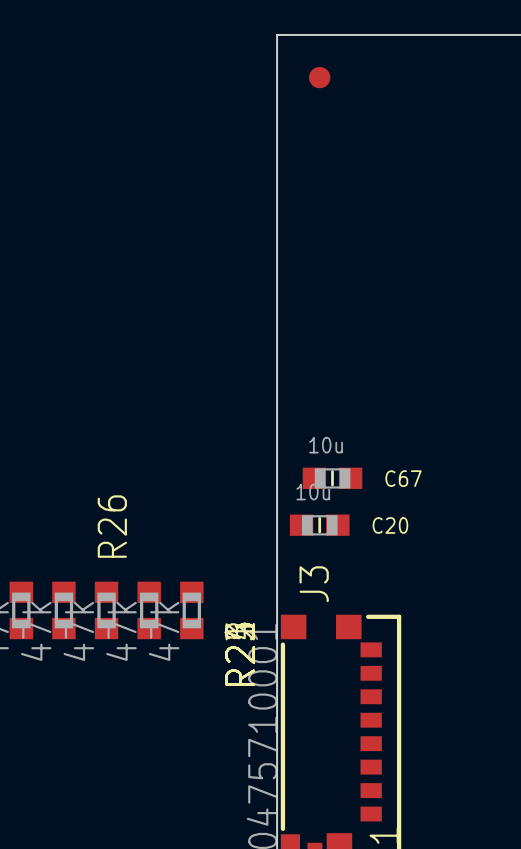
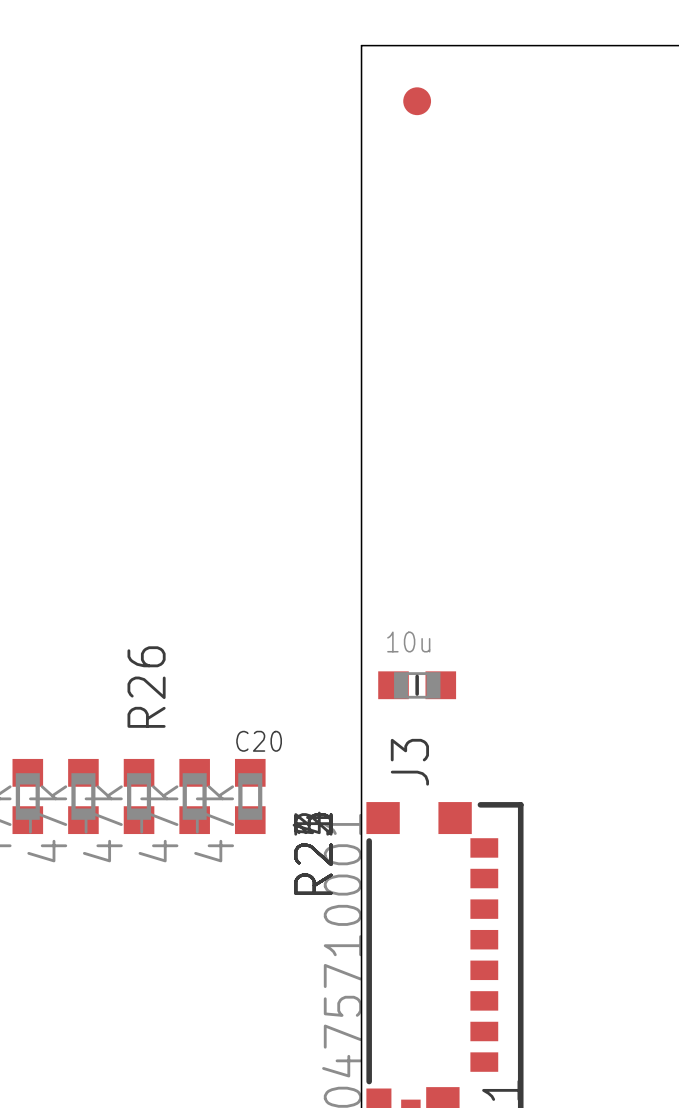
C67: 10u (332, 478) -> none
C20 name position: C20 (390, 525) -> C20 (259, 741)

